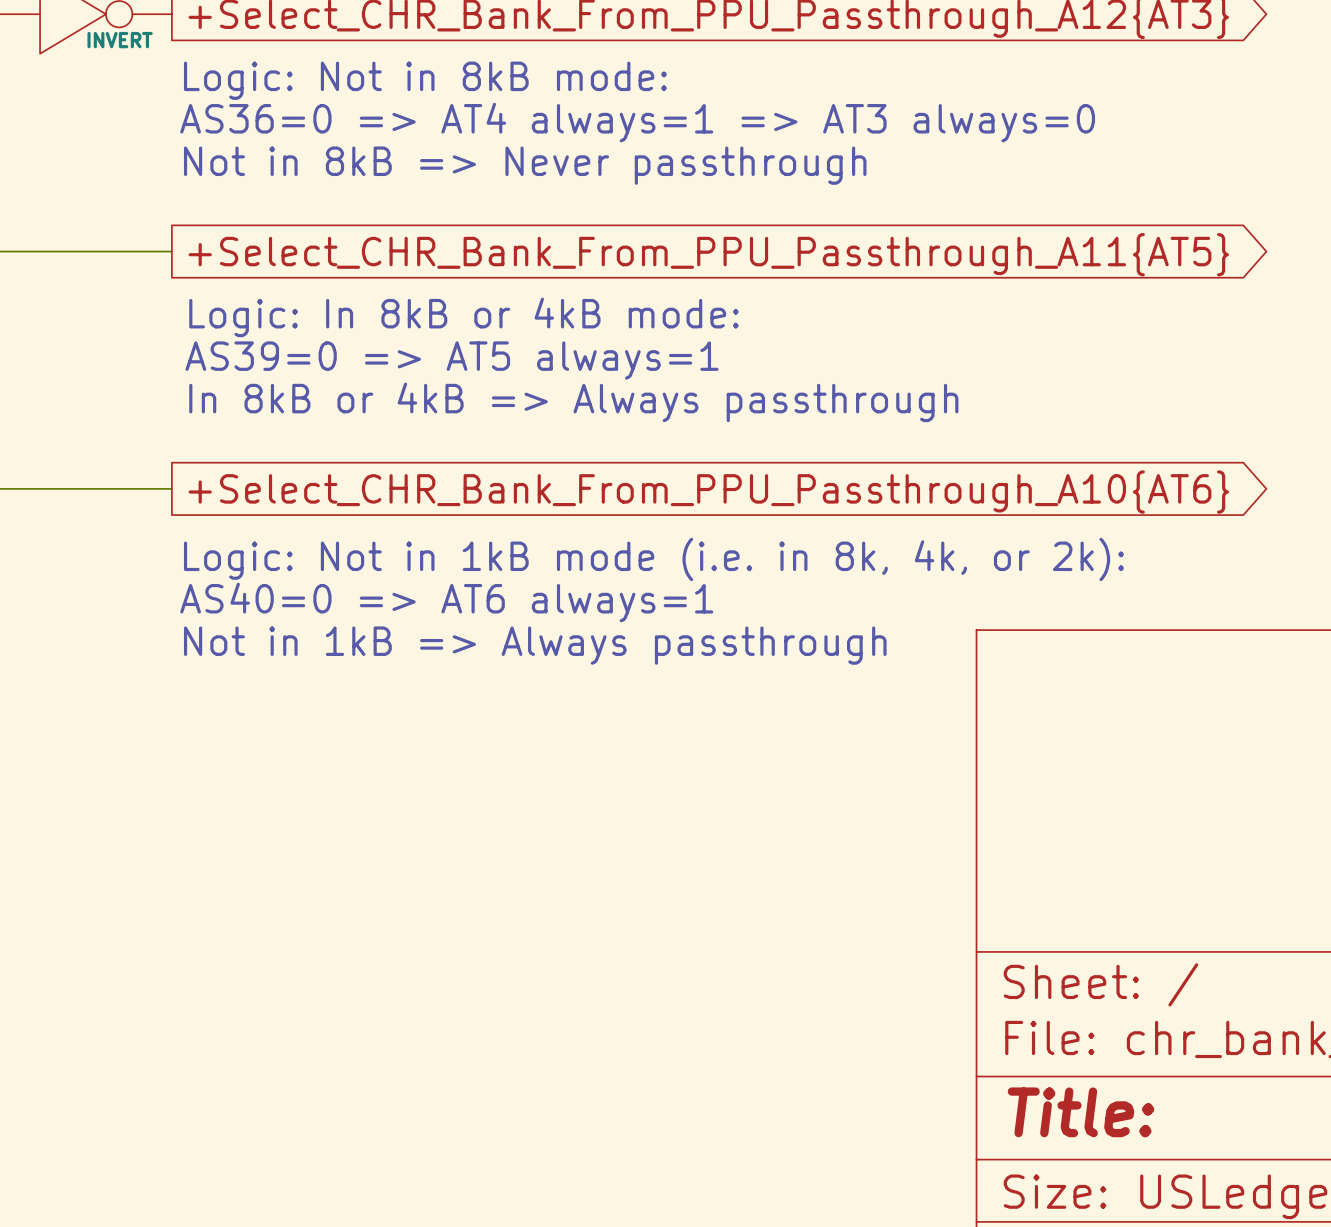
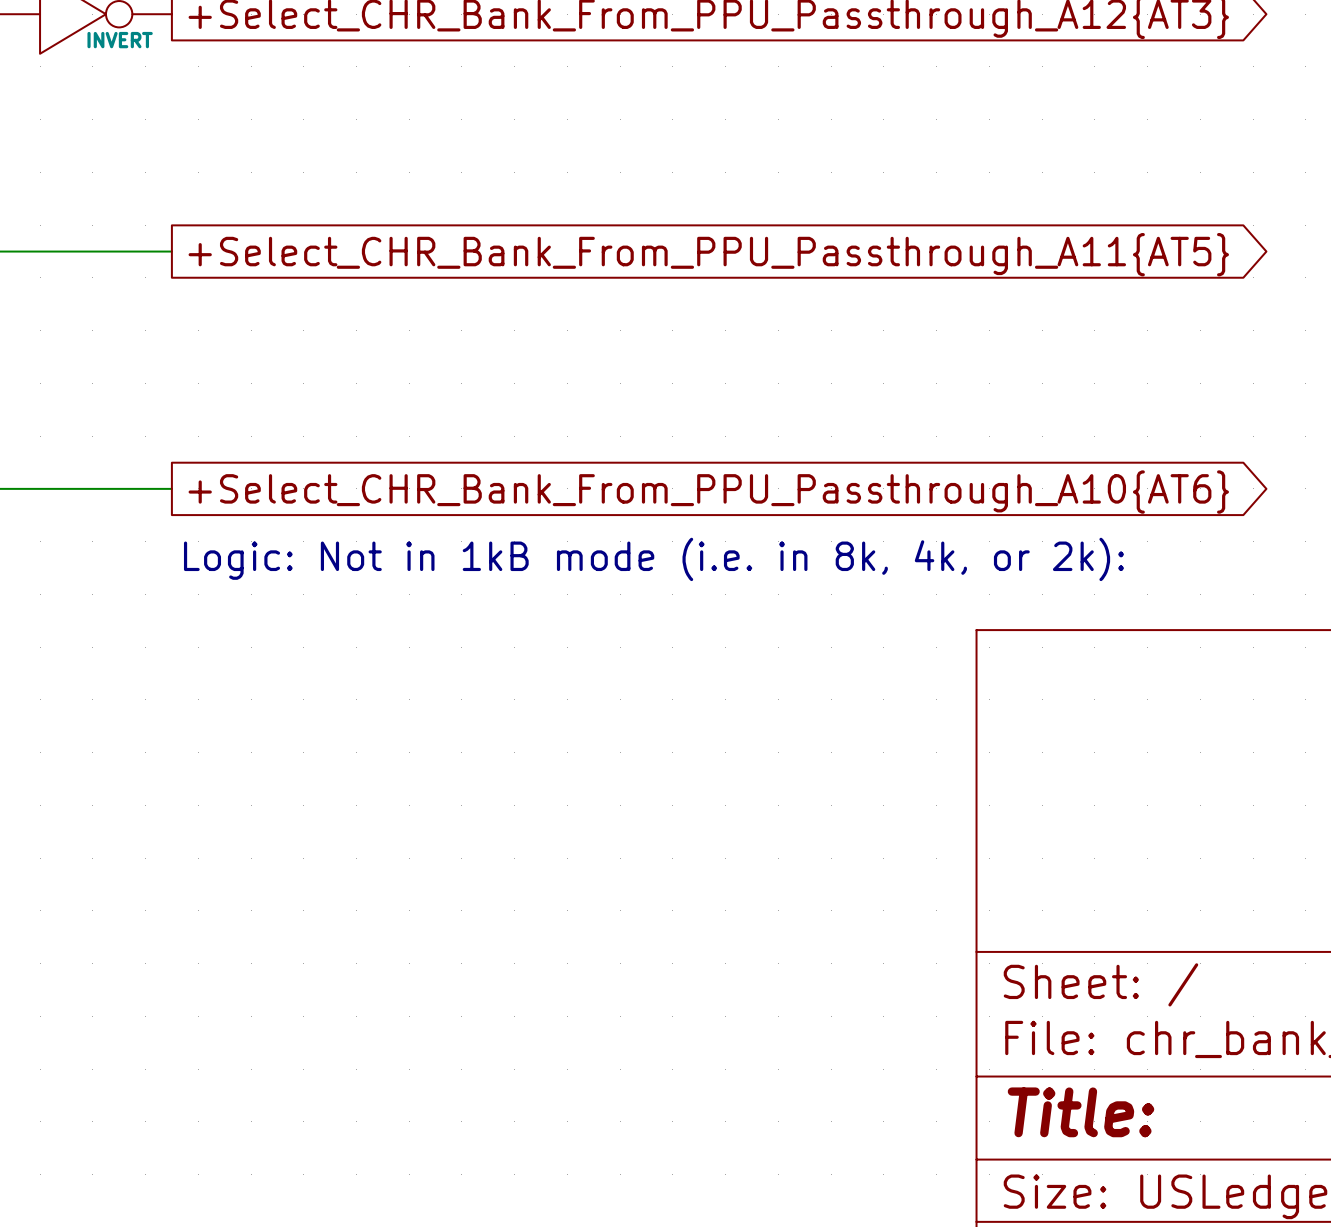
text: Logic: Not in 8kB mode: (425, 80) -> none
text: AS36=0 => AT4 always=1 => AT3 always=0 (637, 122) -> none
text: Not in 8kB => Never passthrough (525, 165) -> none
text: Logic: In 8kB or 4kB mode: (463, 317) -> none
text: AS39=0 => AT5 always=1 (452, 360) -> none
text: In 8kB or 4kB => Always passthrough (573, 402) -> none
text: AS40=0 => AT6 always=1 (446, 602) -> none
text: Not in 1kB => Always passthrough (535, 645) -> none

